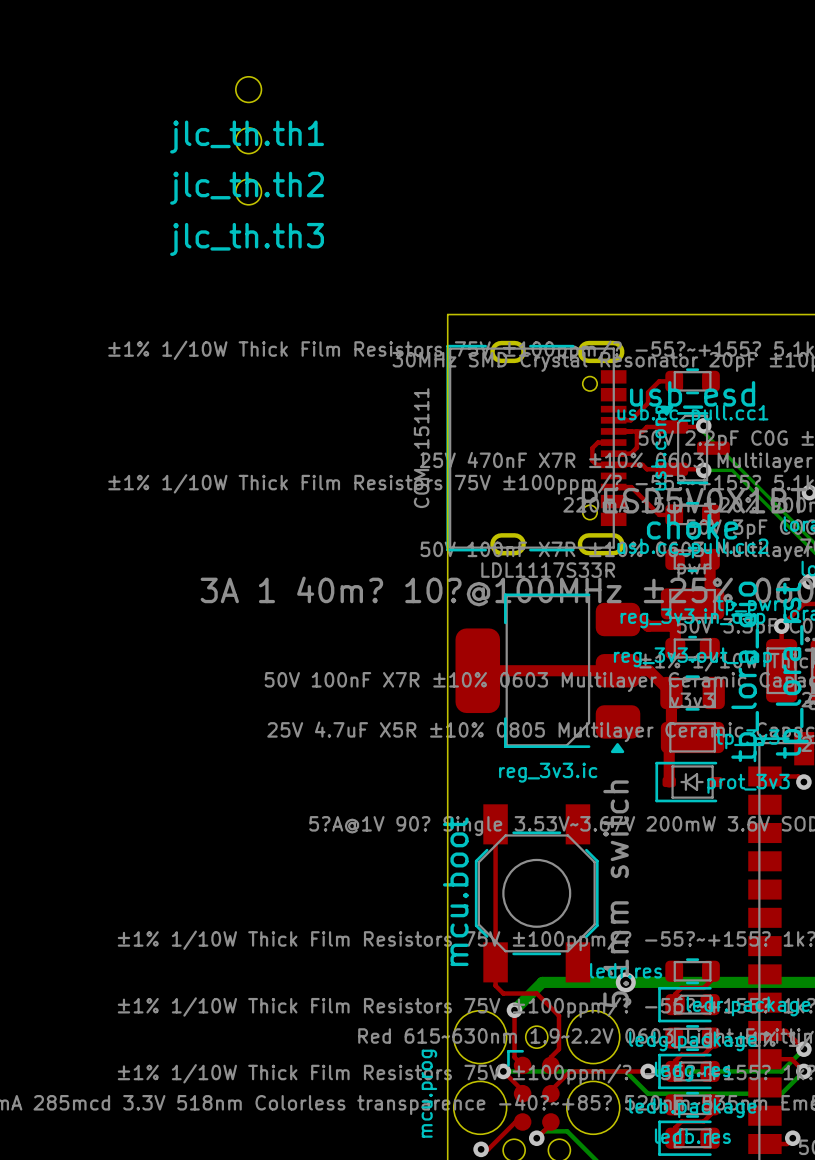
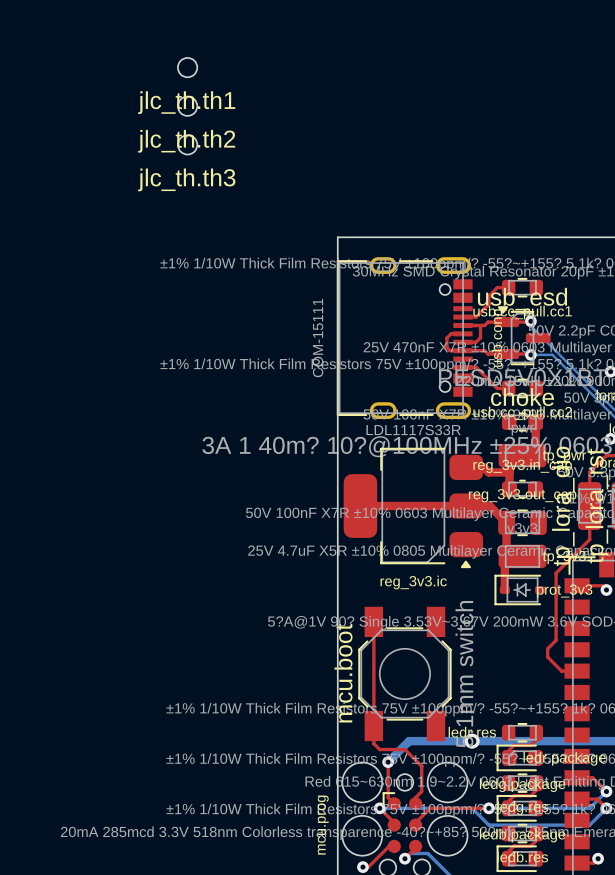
via: (781, 626) -> none
top track: none -> (589, 506) (589, 539) (556, 573) (556, 640) (547, 648) (547, 657) (561, 671) (577, 671)

